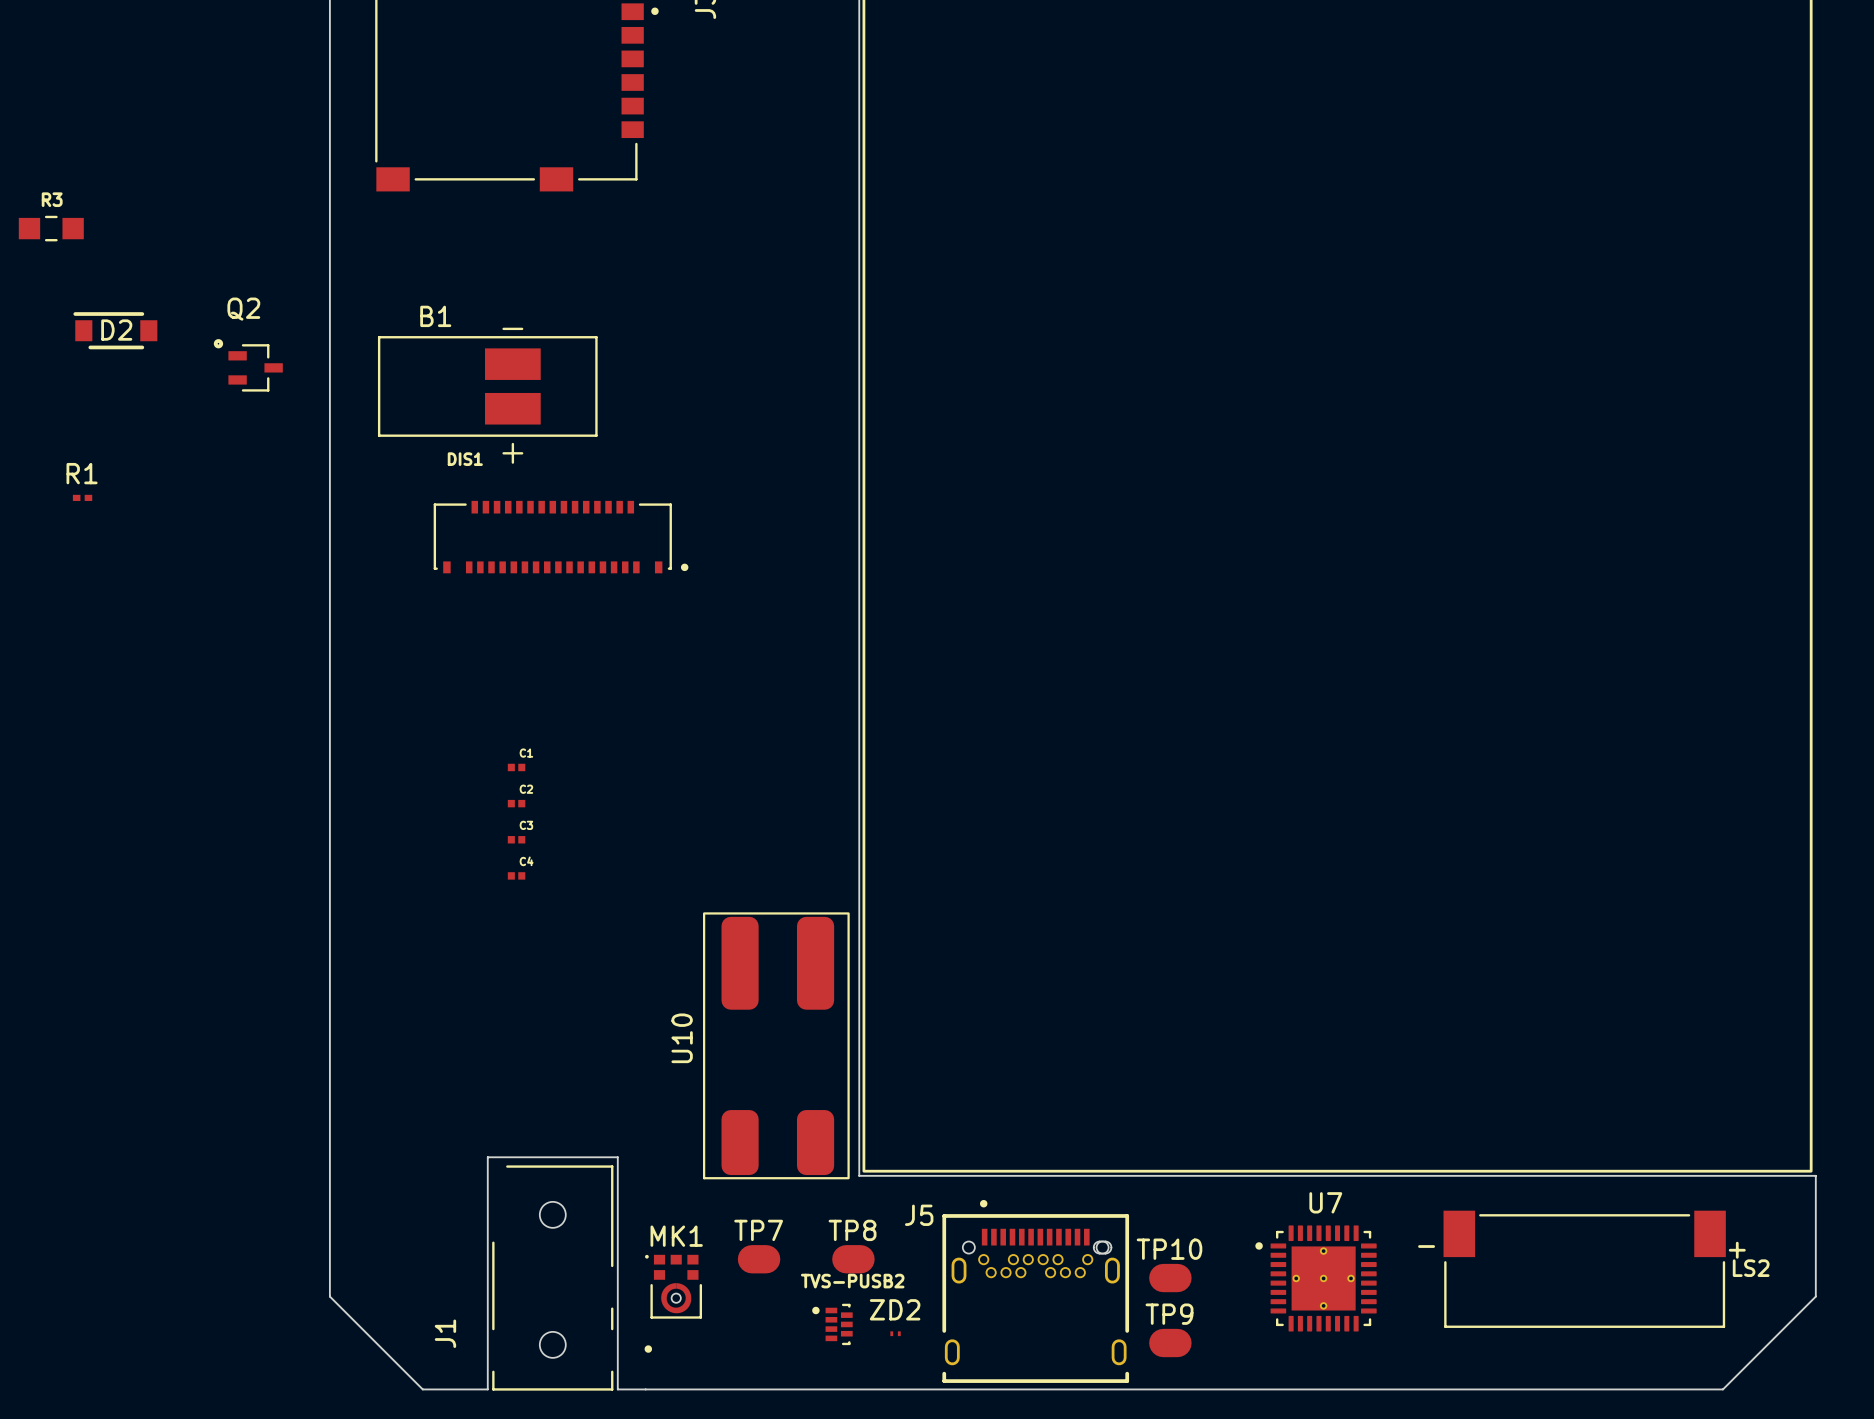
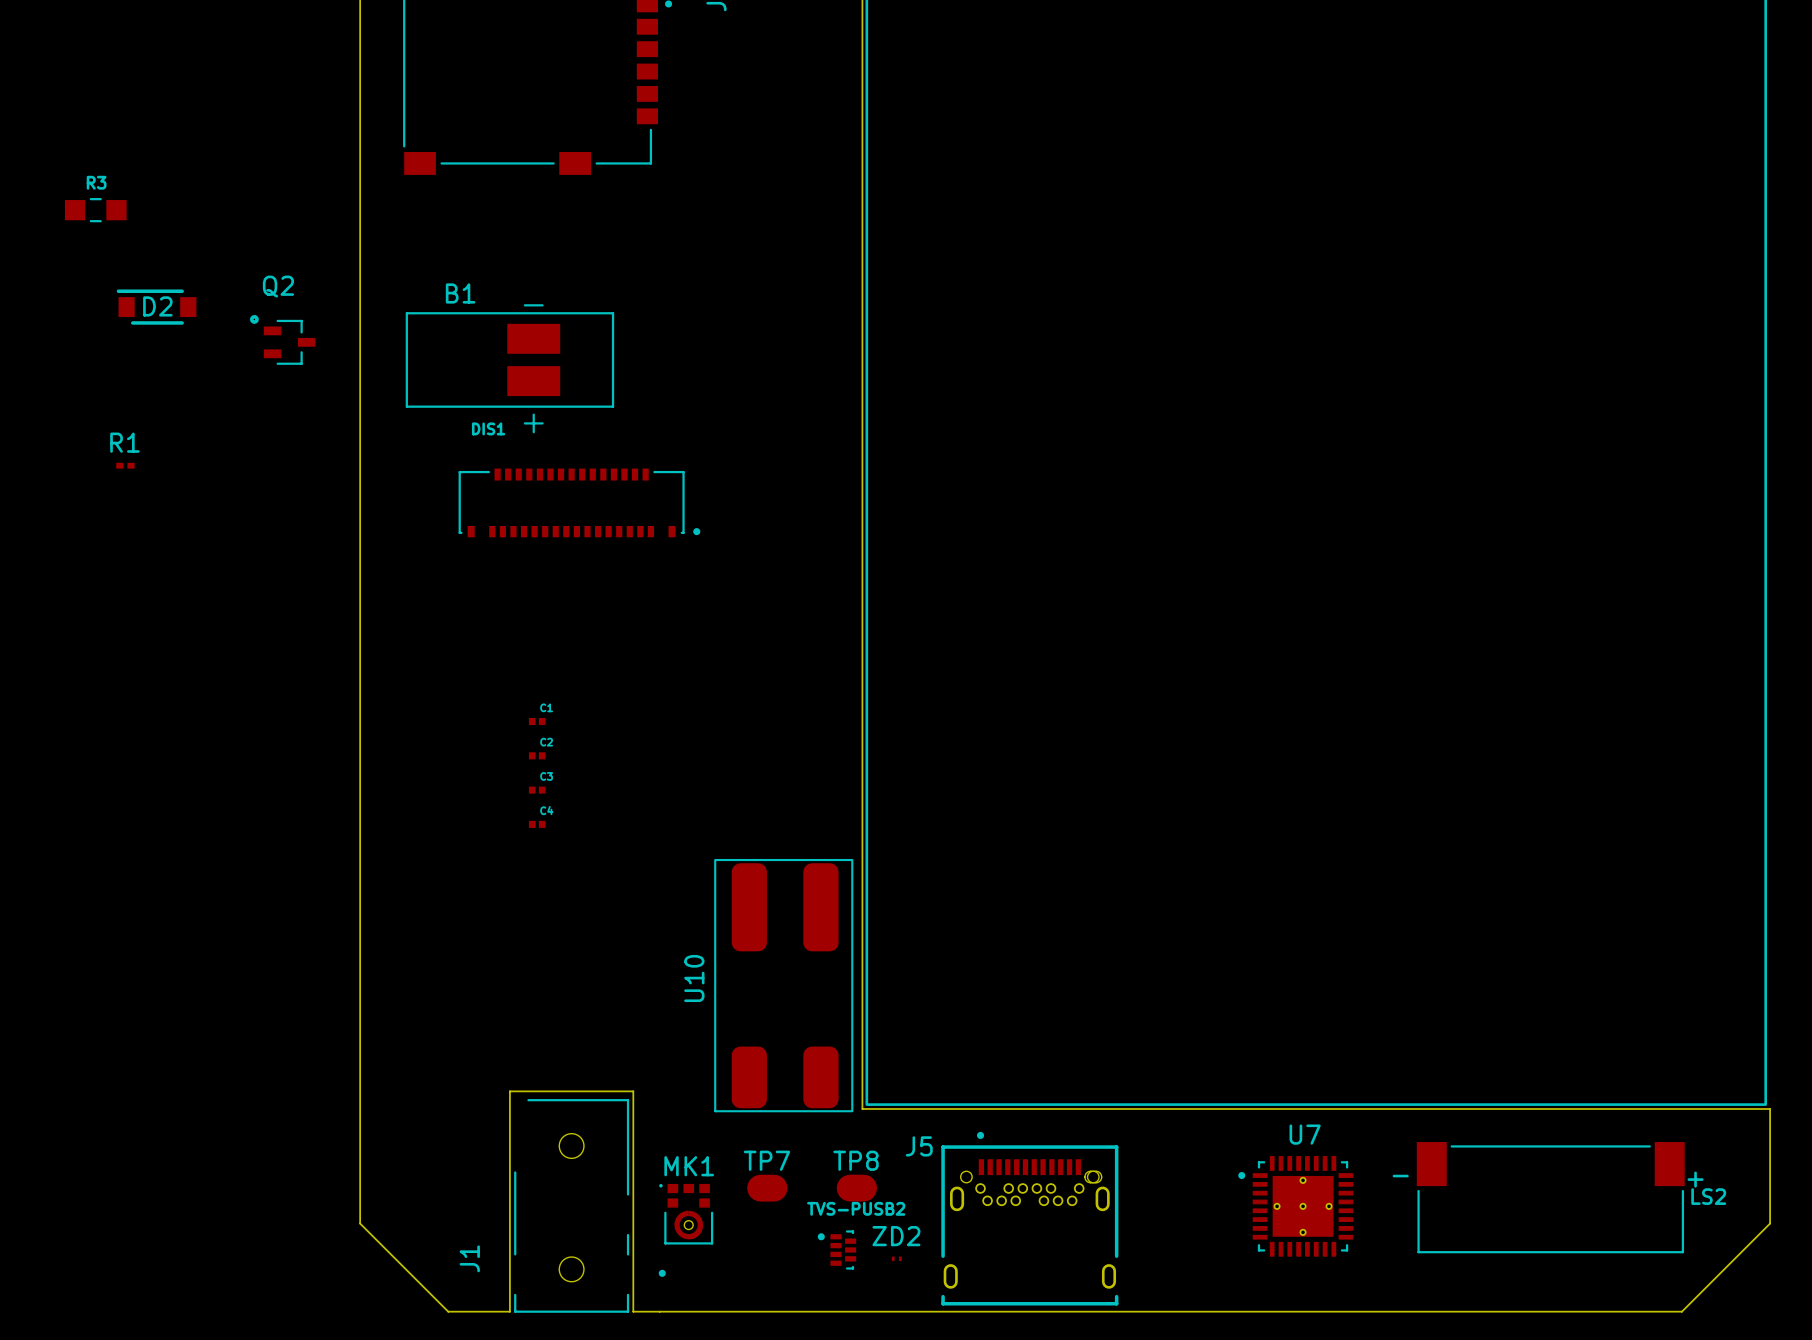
TP10: (1170, 1278) -> none
TP9: (1170, 1343) -> none

